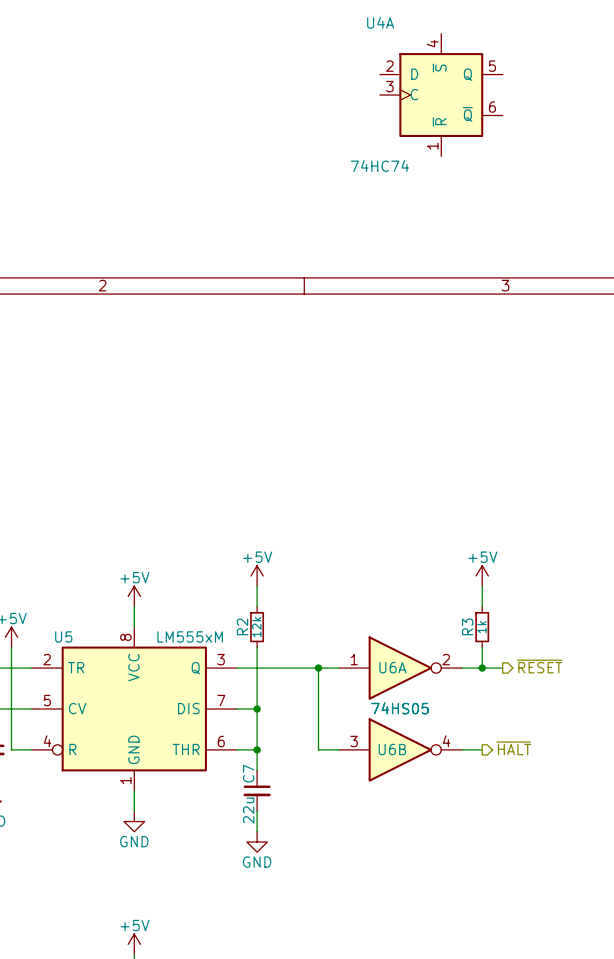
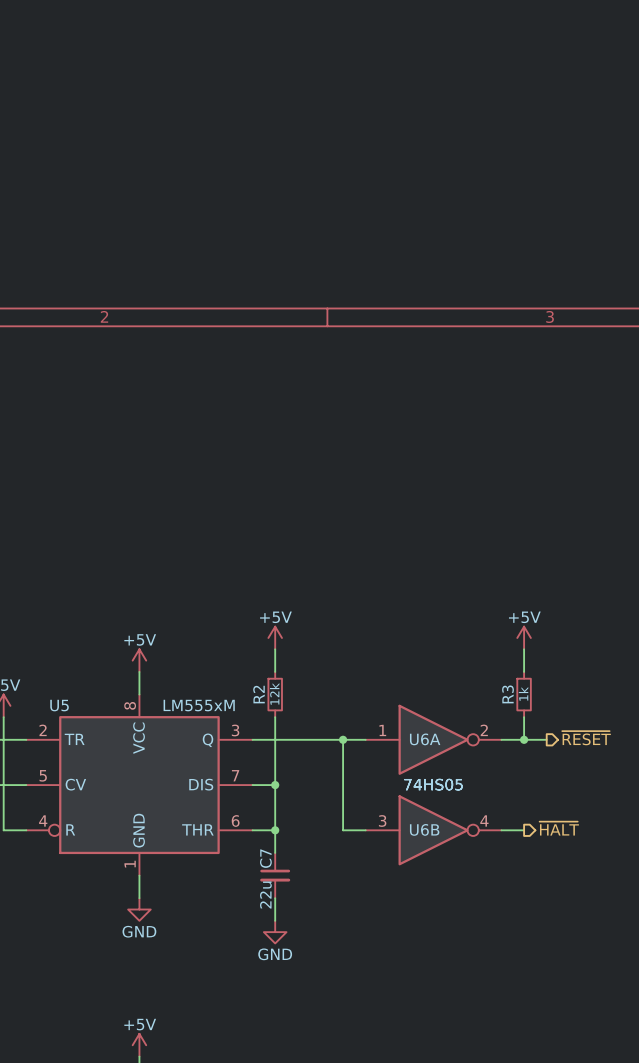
U4A: 74HC74 (441, 95) -> none

